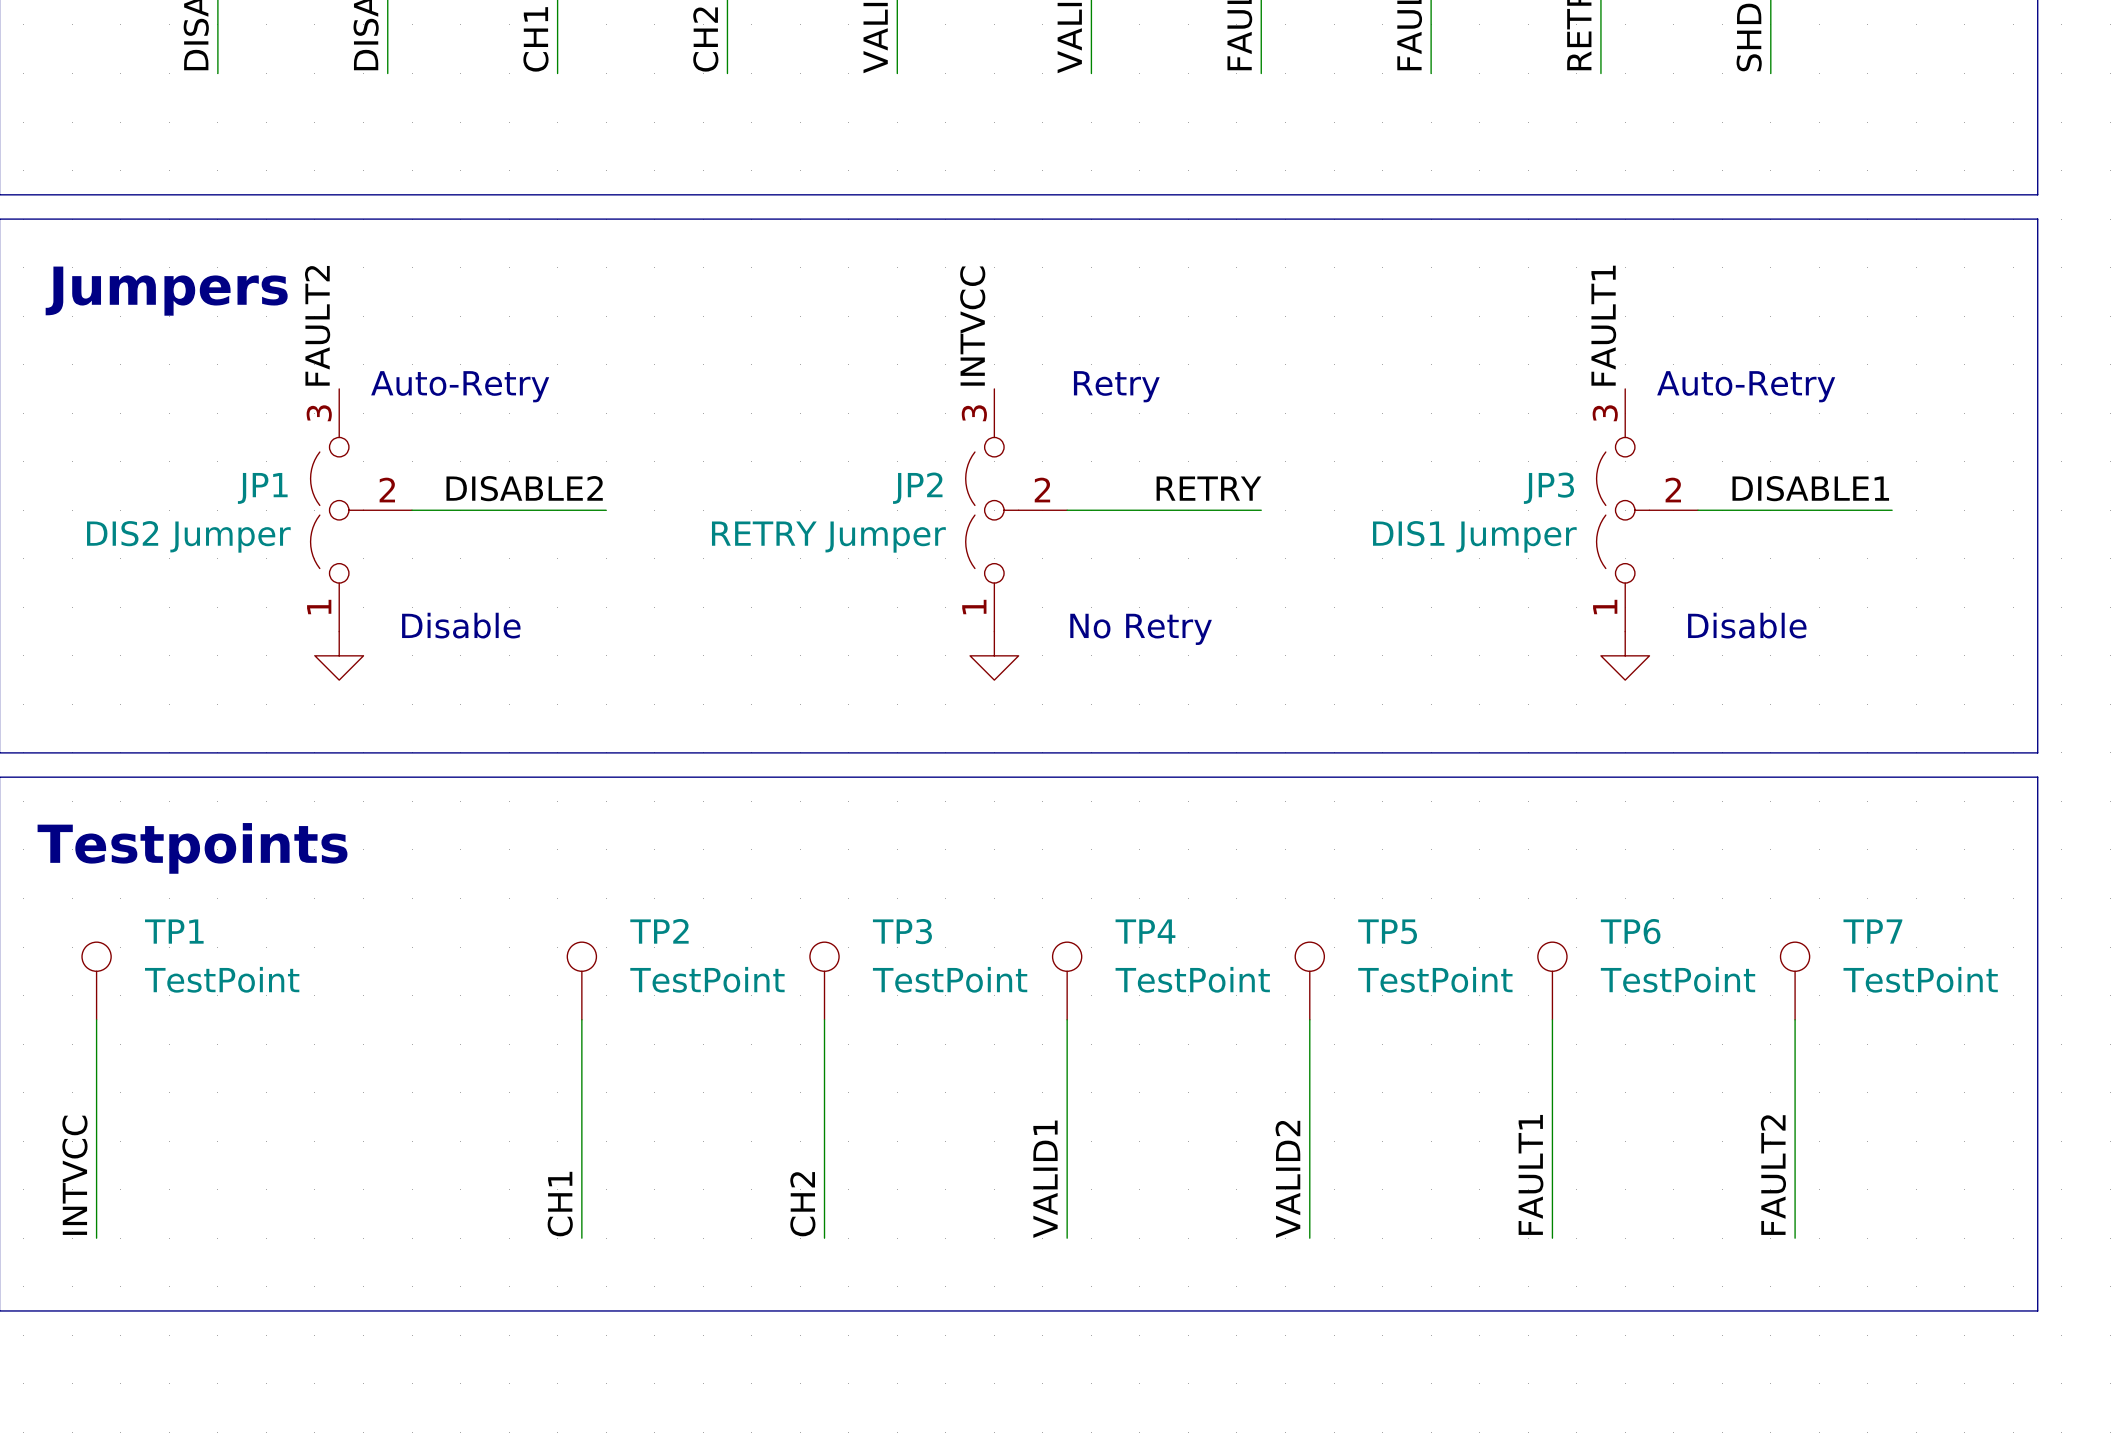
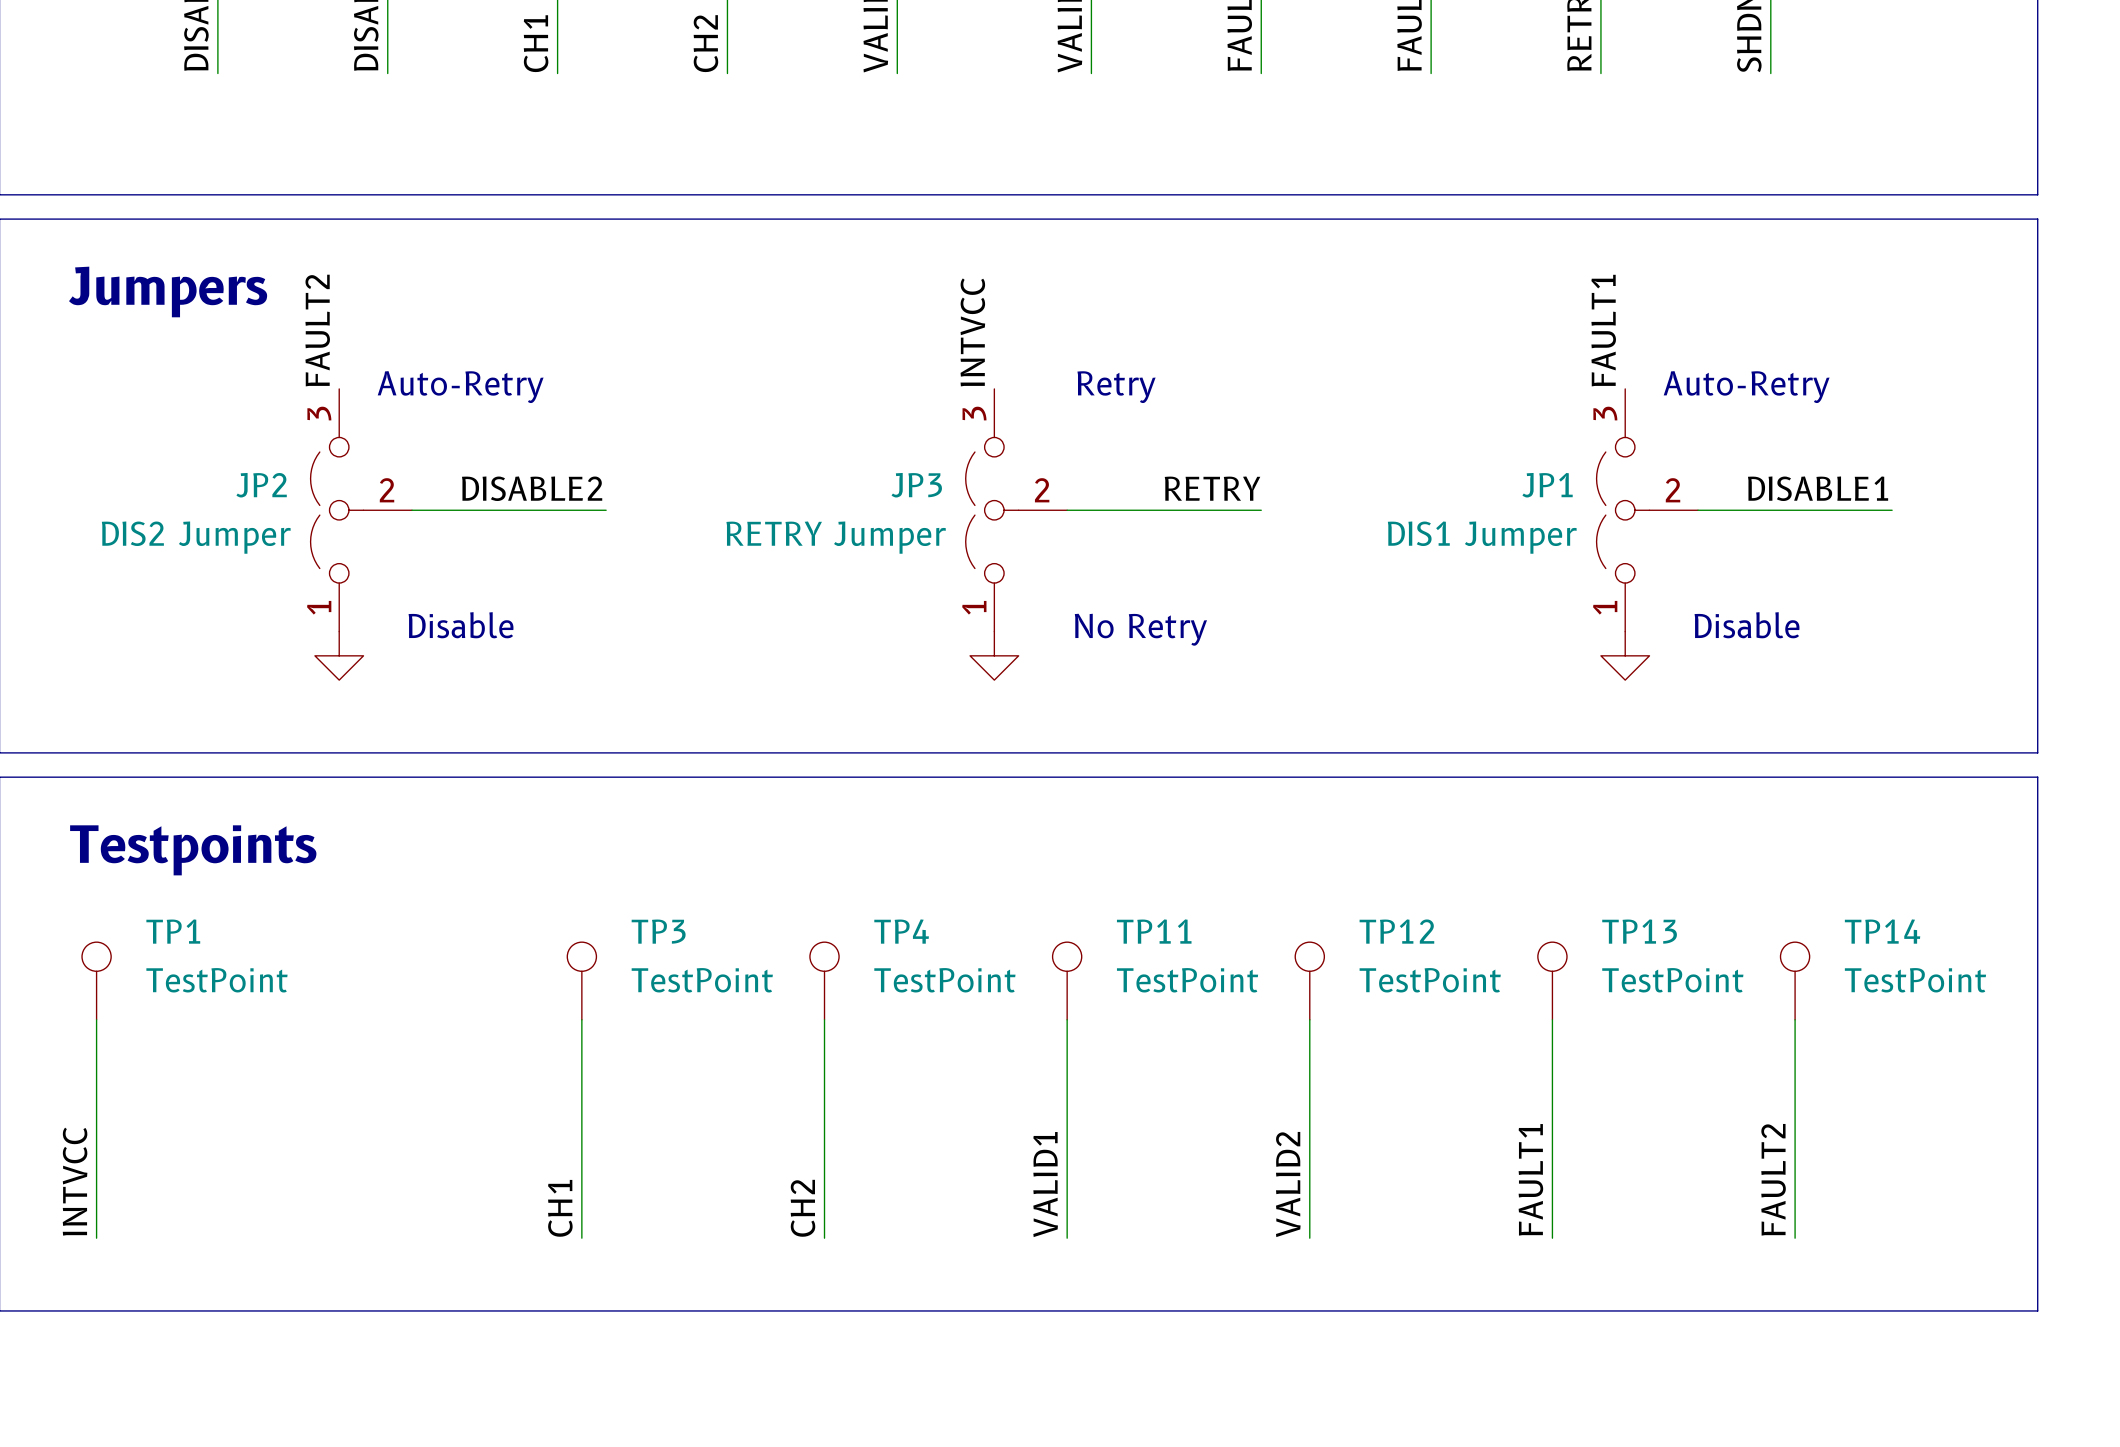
JP1 name: JP1 (262, 488) -> JP2 (261, 485)
JP2 name: JP2 (917, 488) -> JP3 (916, 485)
JP3 name: JP3 (1548, 488) -> JP1 (1547, 485)
TP2 name: TP2 (659, 931) -> TP3 (658, 931)
TP3 name: TP3 (902, 931) -> TP4 (901, 931)
TP4 name: TP4 (1145, 931) -> TP11 (1154, 931)
TP5 name: TP5 (1387, 931) -> TP12 (1396, 931)
TP6 name: TP6 (1630, 931) -> TP13 (1639, 931)
TP7 name: TP7 (1872, 931) -> TP14 (1882, 931)

